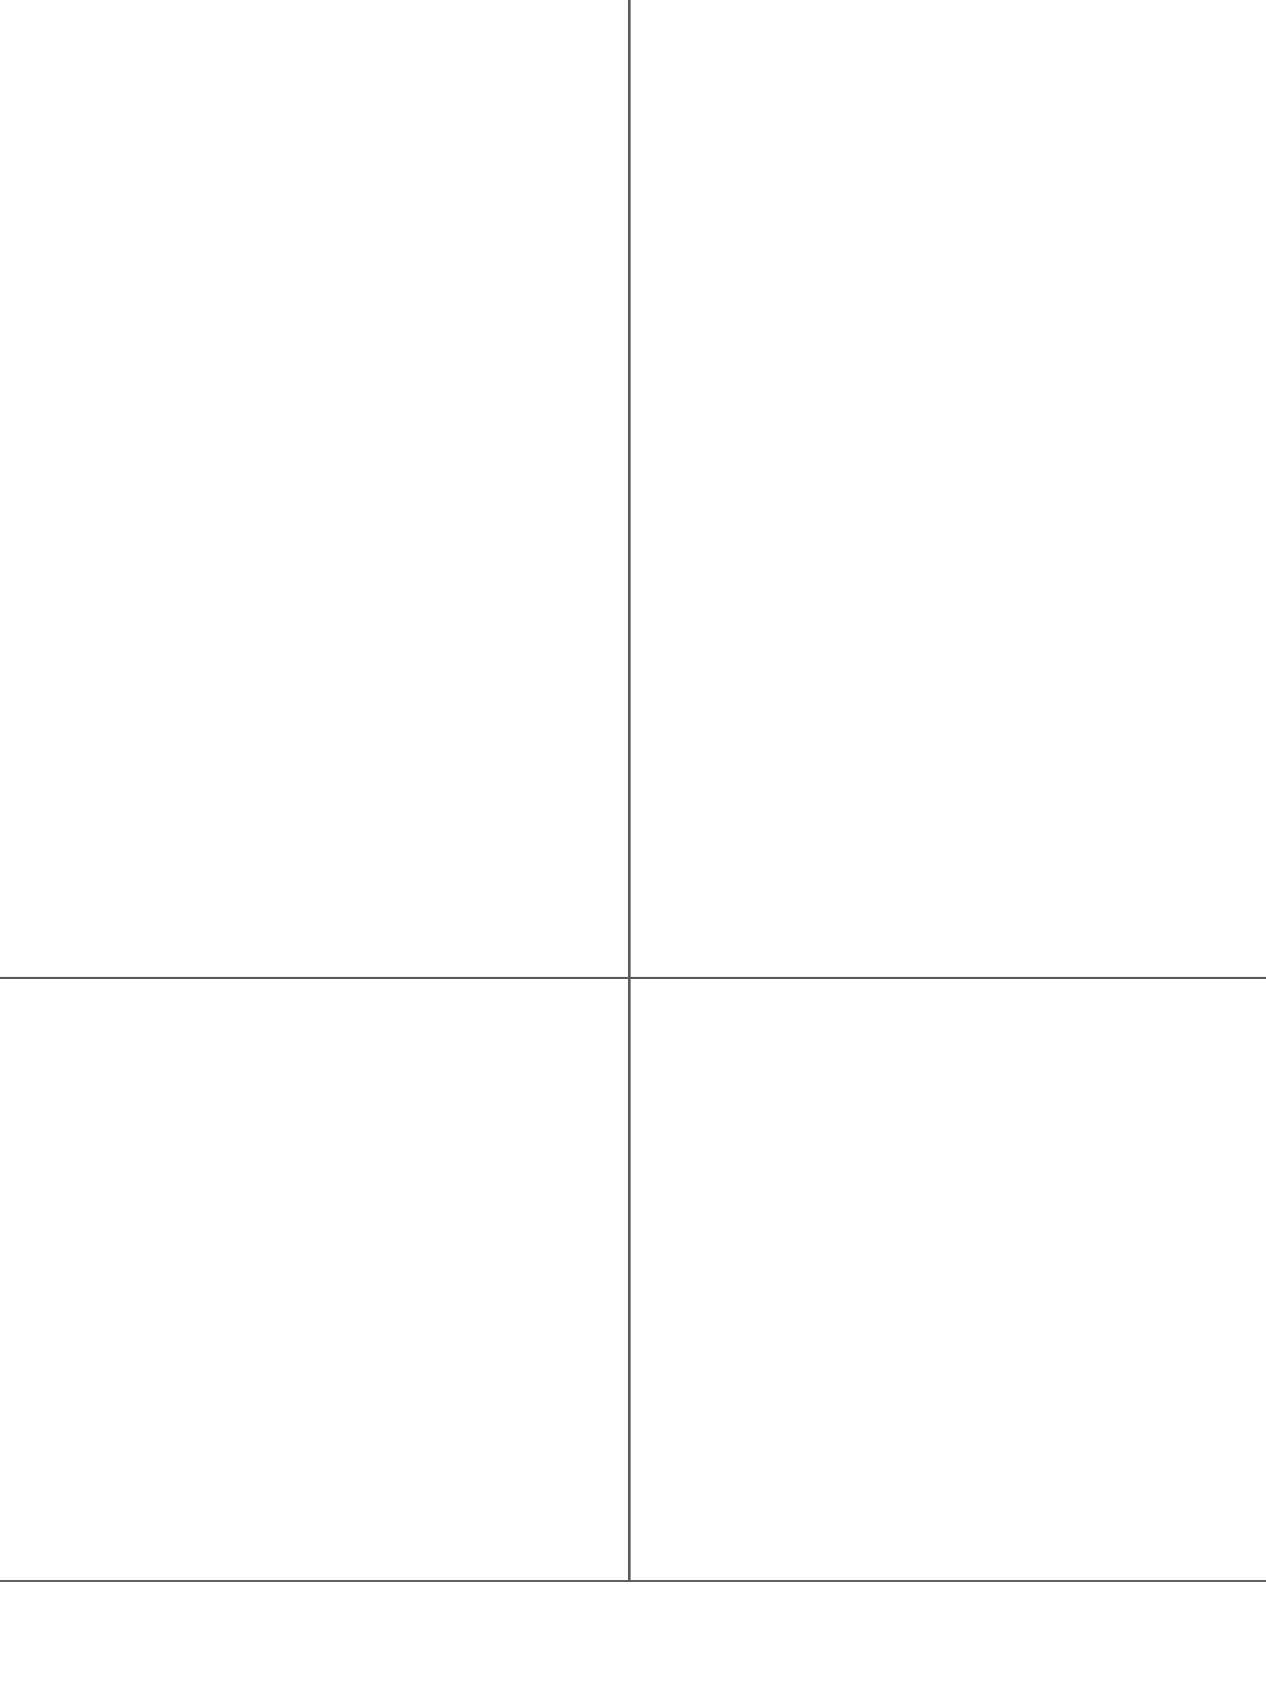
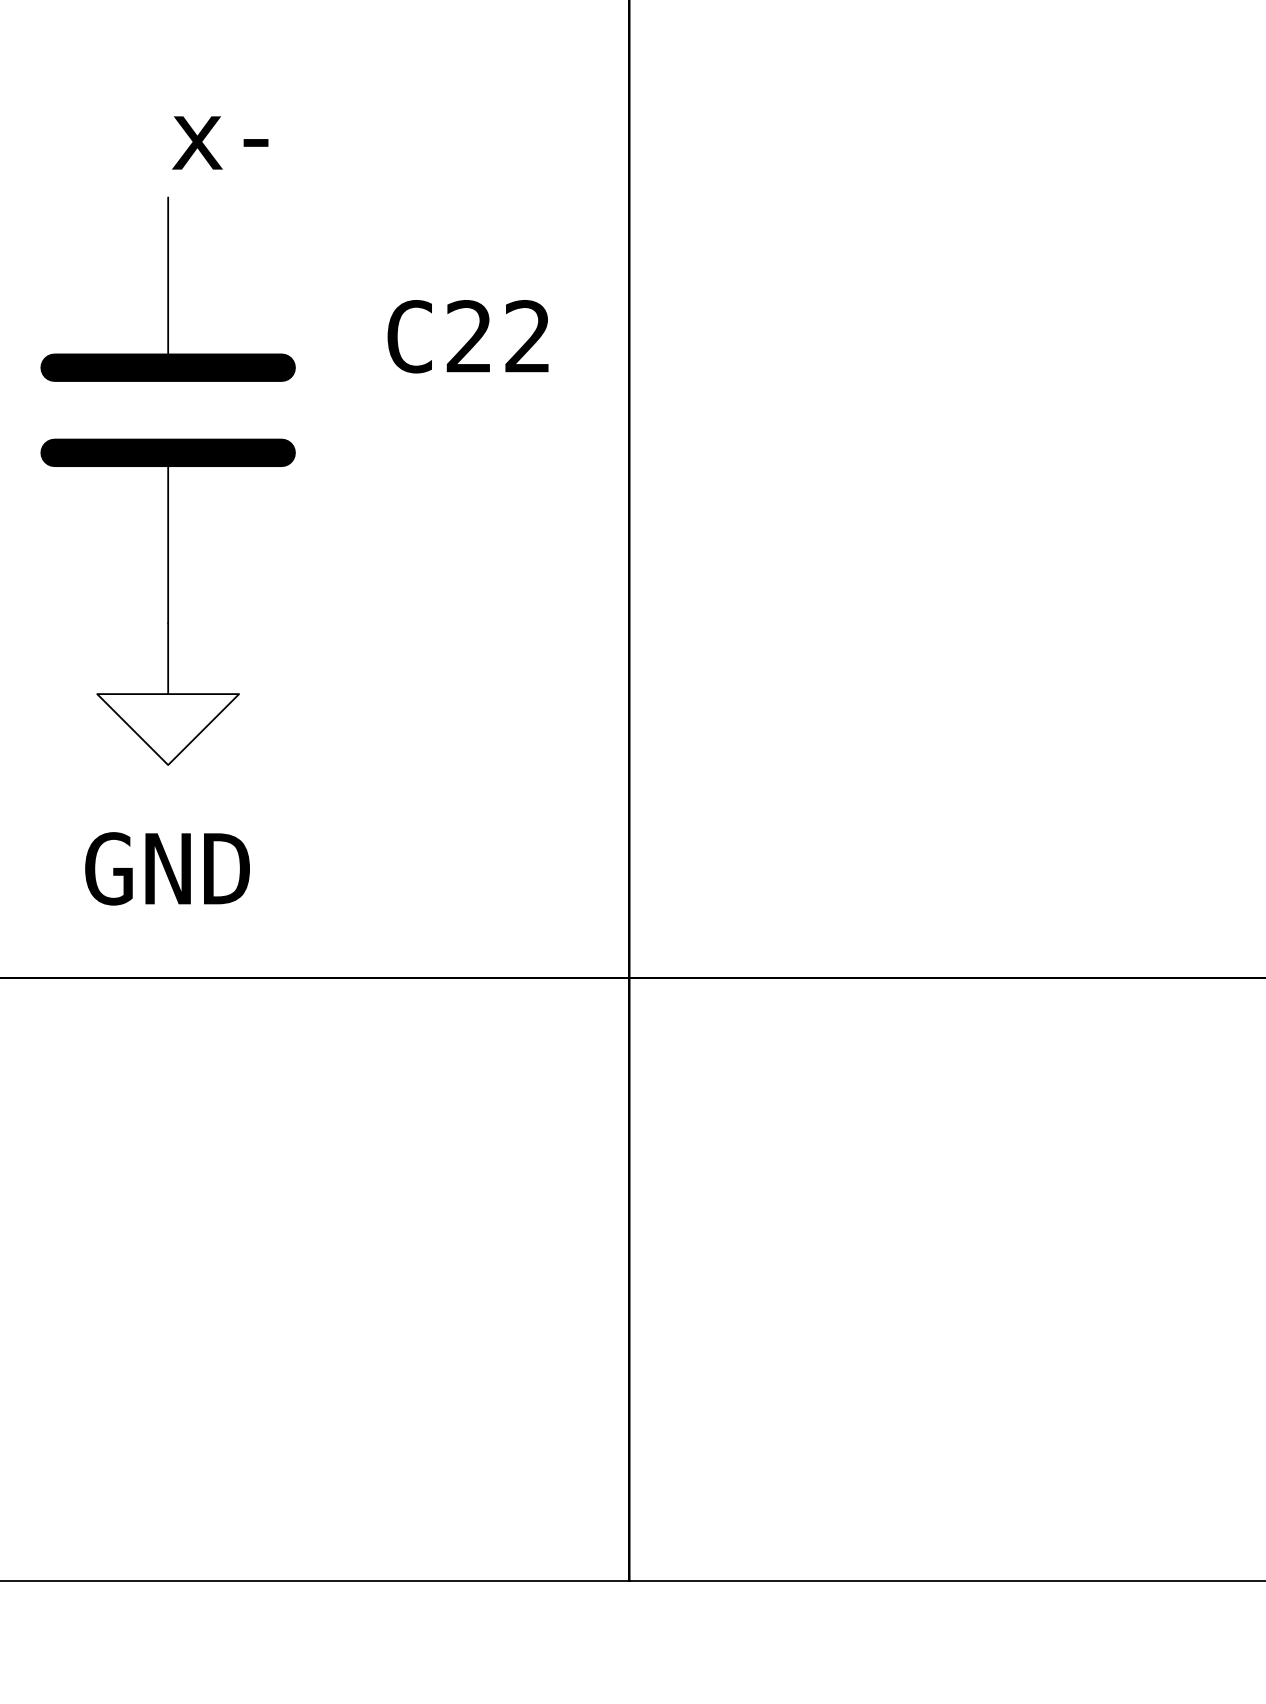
label: none -> x- (220, 142)
C22: none -> (168, 410)
power symbol: none -> GND (168, 694)

